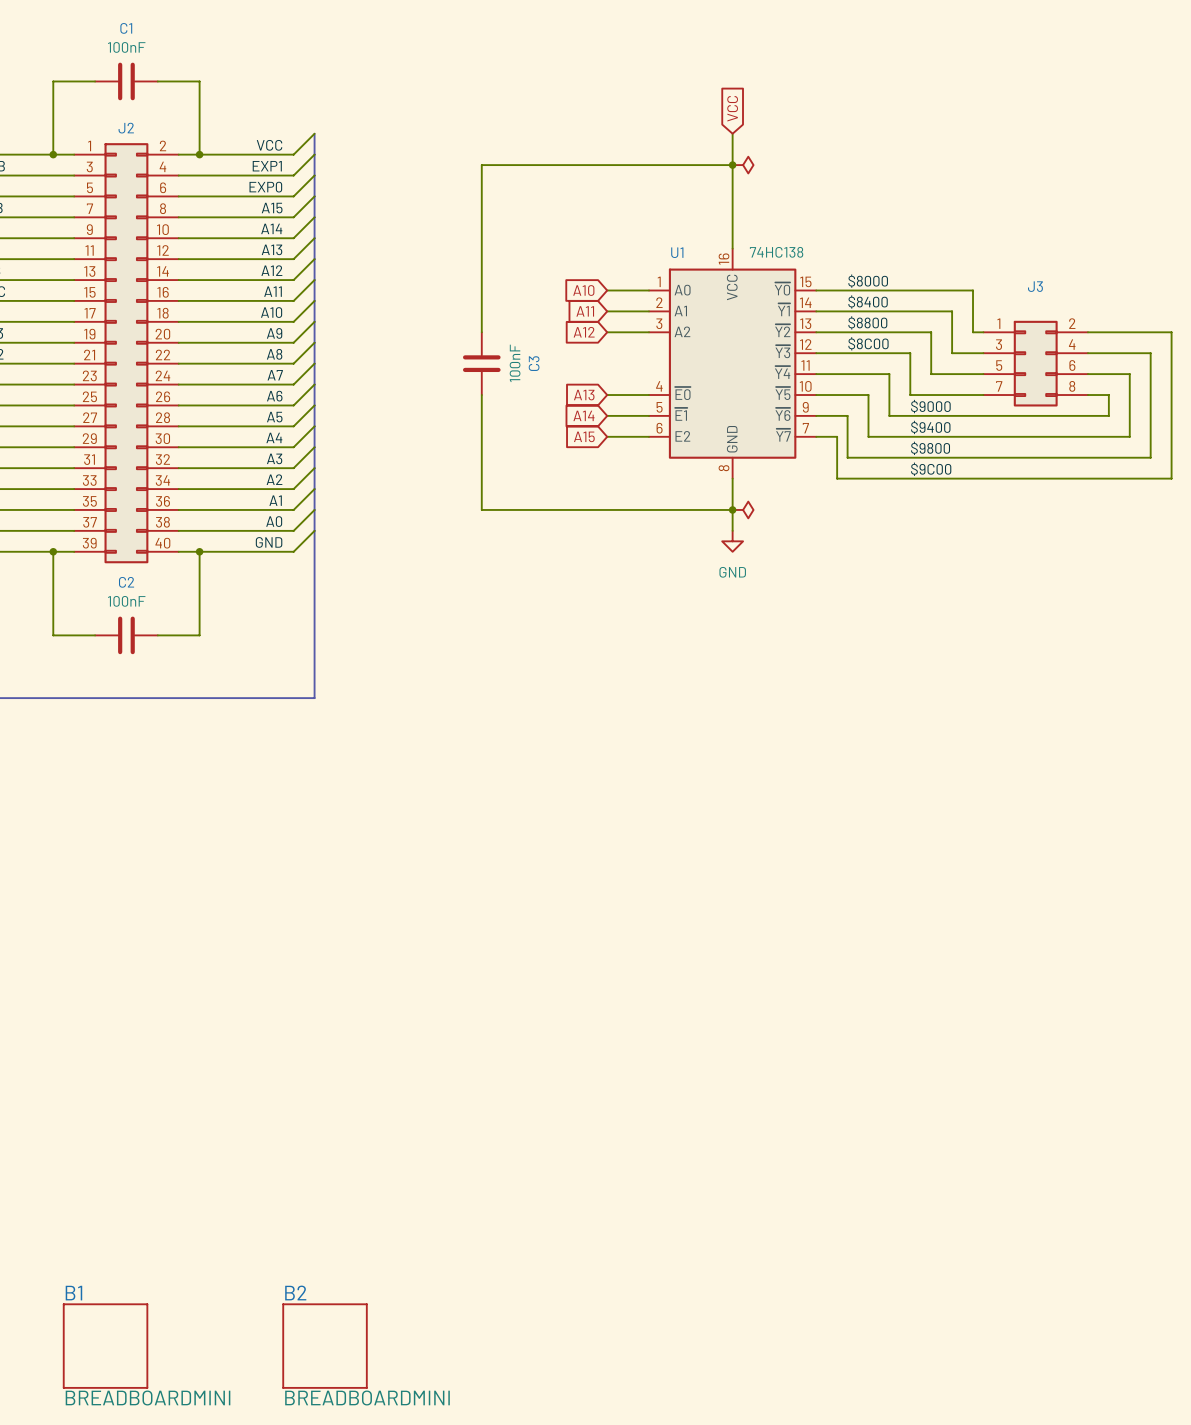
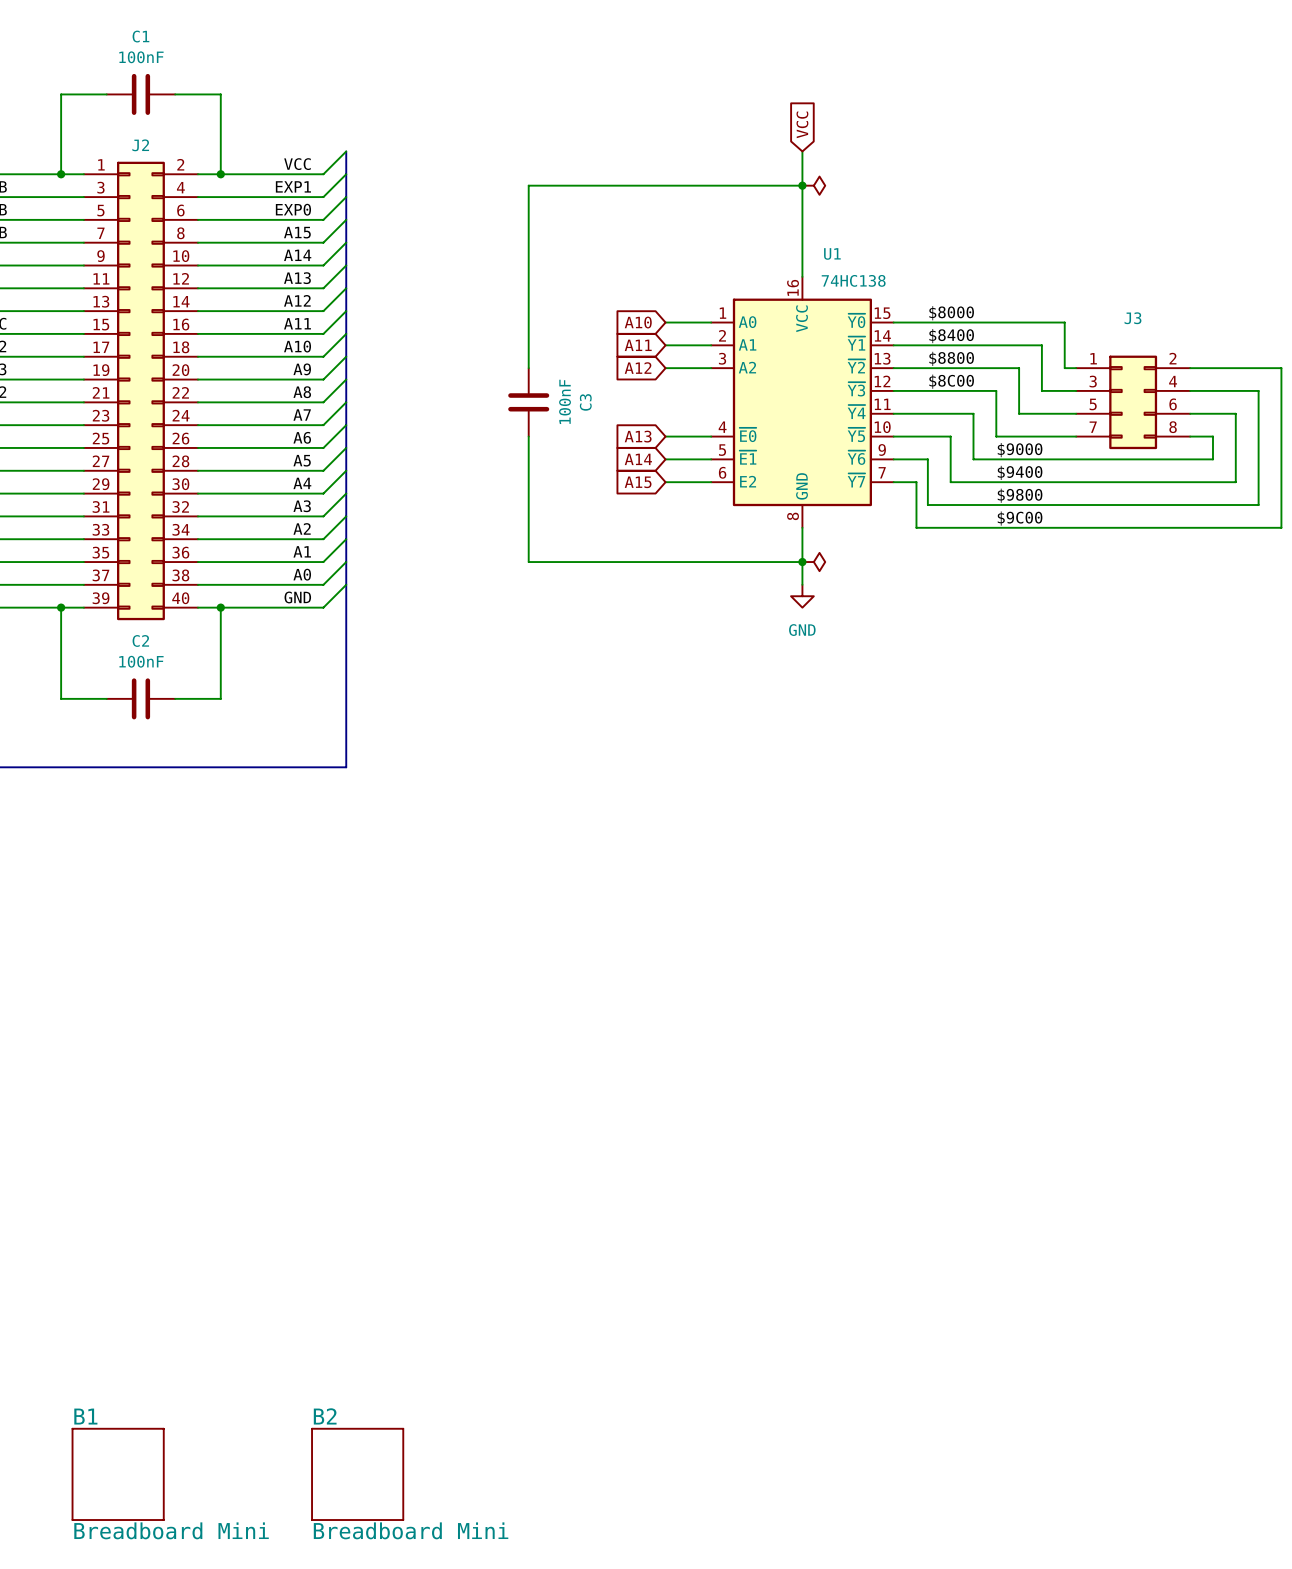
U1 name position: U1 (677, 252) -> U1 (832, 253)
B1 value: BREADBOARDMINI (148, 1397) -> Breadboard Mini (171, 1530)
B2 value: BREADBOARDMINI (367, 1397) -> Breadboard Mini (411, 1530)

